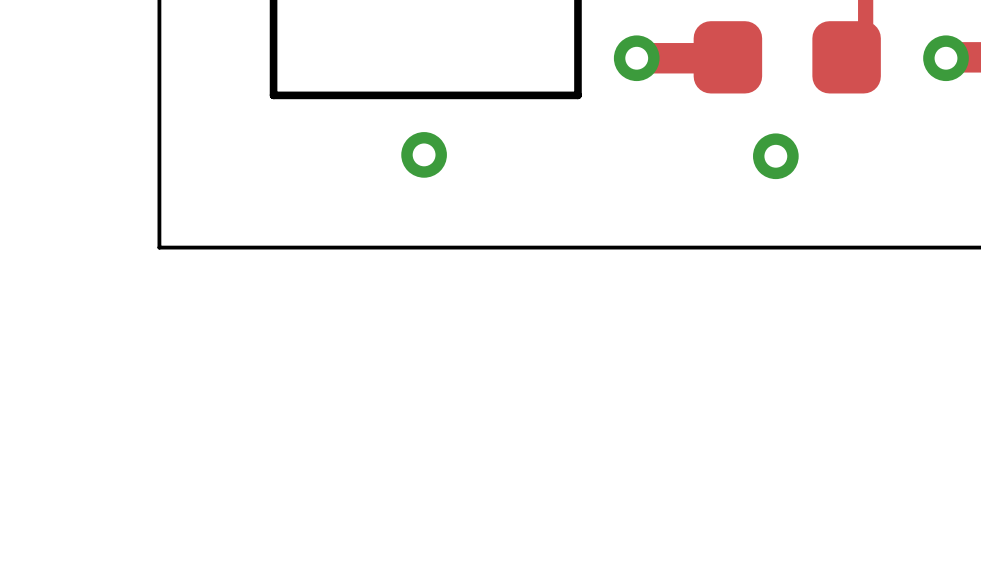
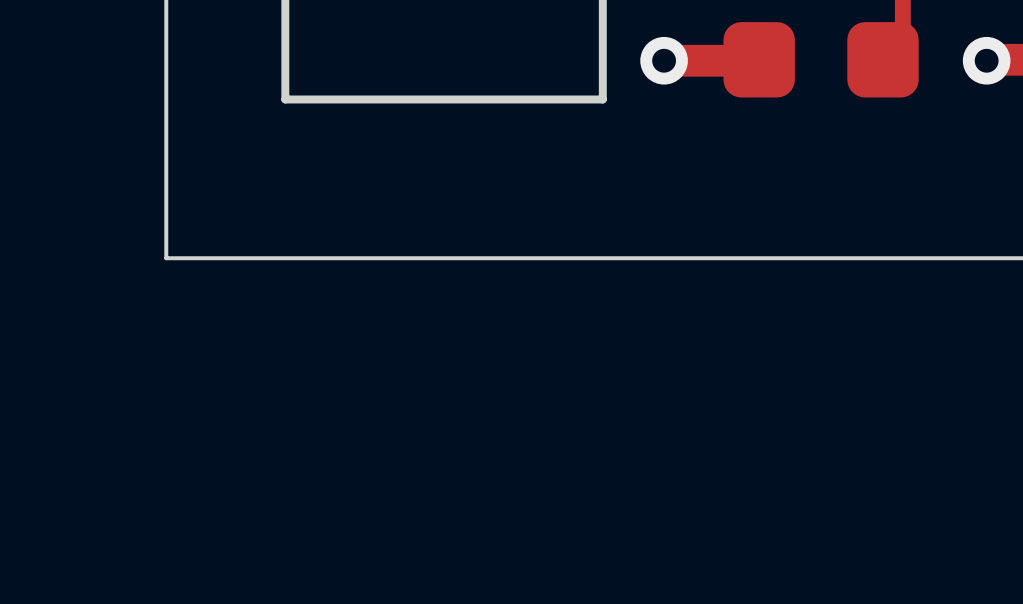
via: (424, 154) -> none
via: (775, 156) -> none

